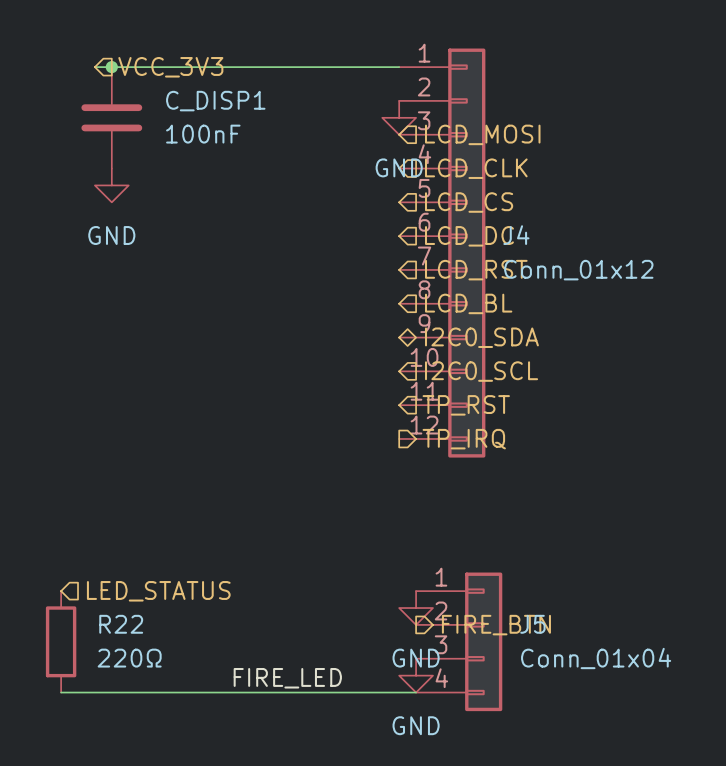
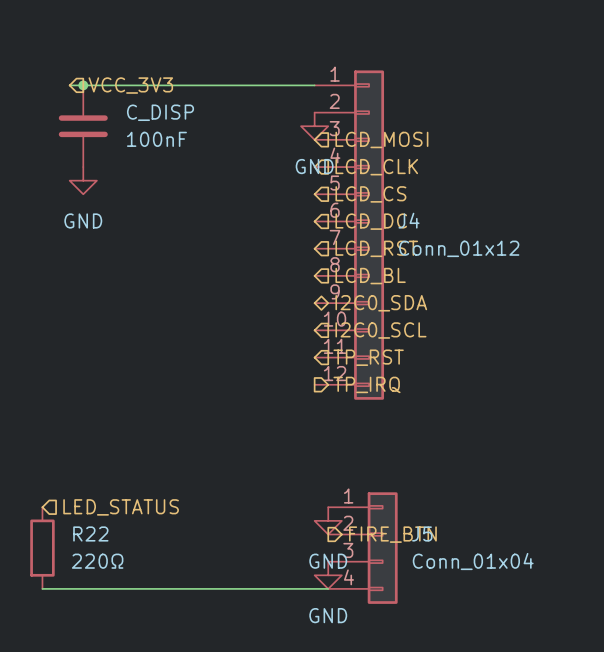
C_DISP1 name: C_DISP1 (215, 101) -> C_DISP (160, 112)
label: FIRE_LED (287, 678) -> none

